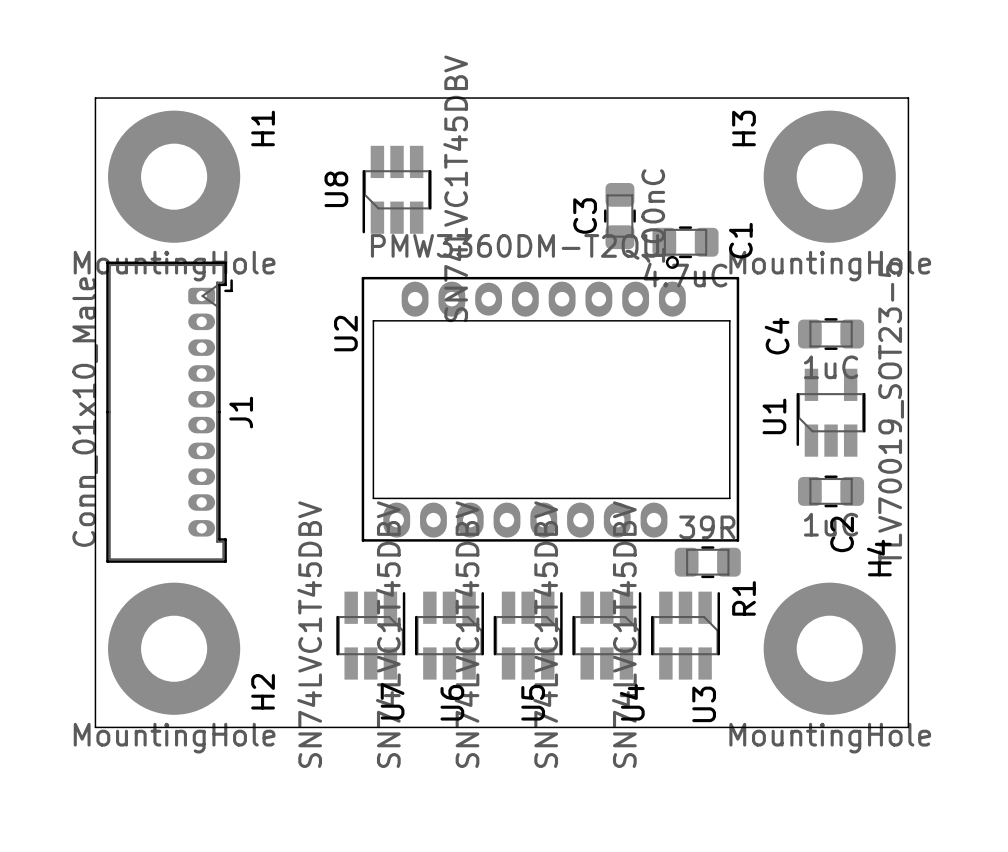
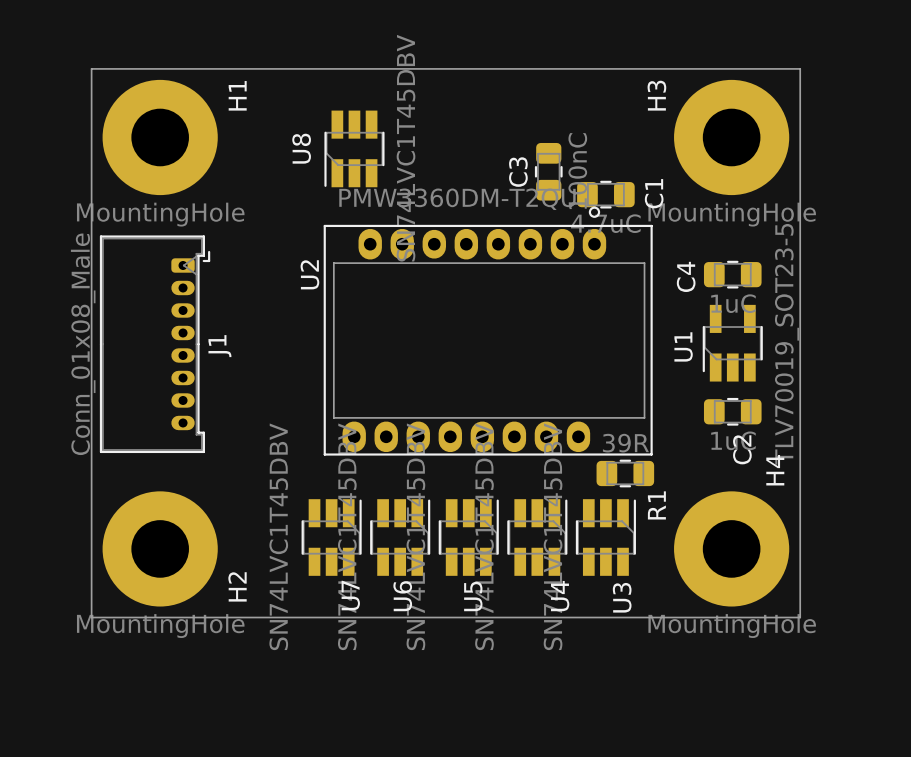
J1 footprint: [106, 261, 233, 563] -> [99, 235, 211, 454]
J1 value: Conn_01x10_Male (85, 412) -> Conn_01x08_Male (83, 344)

